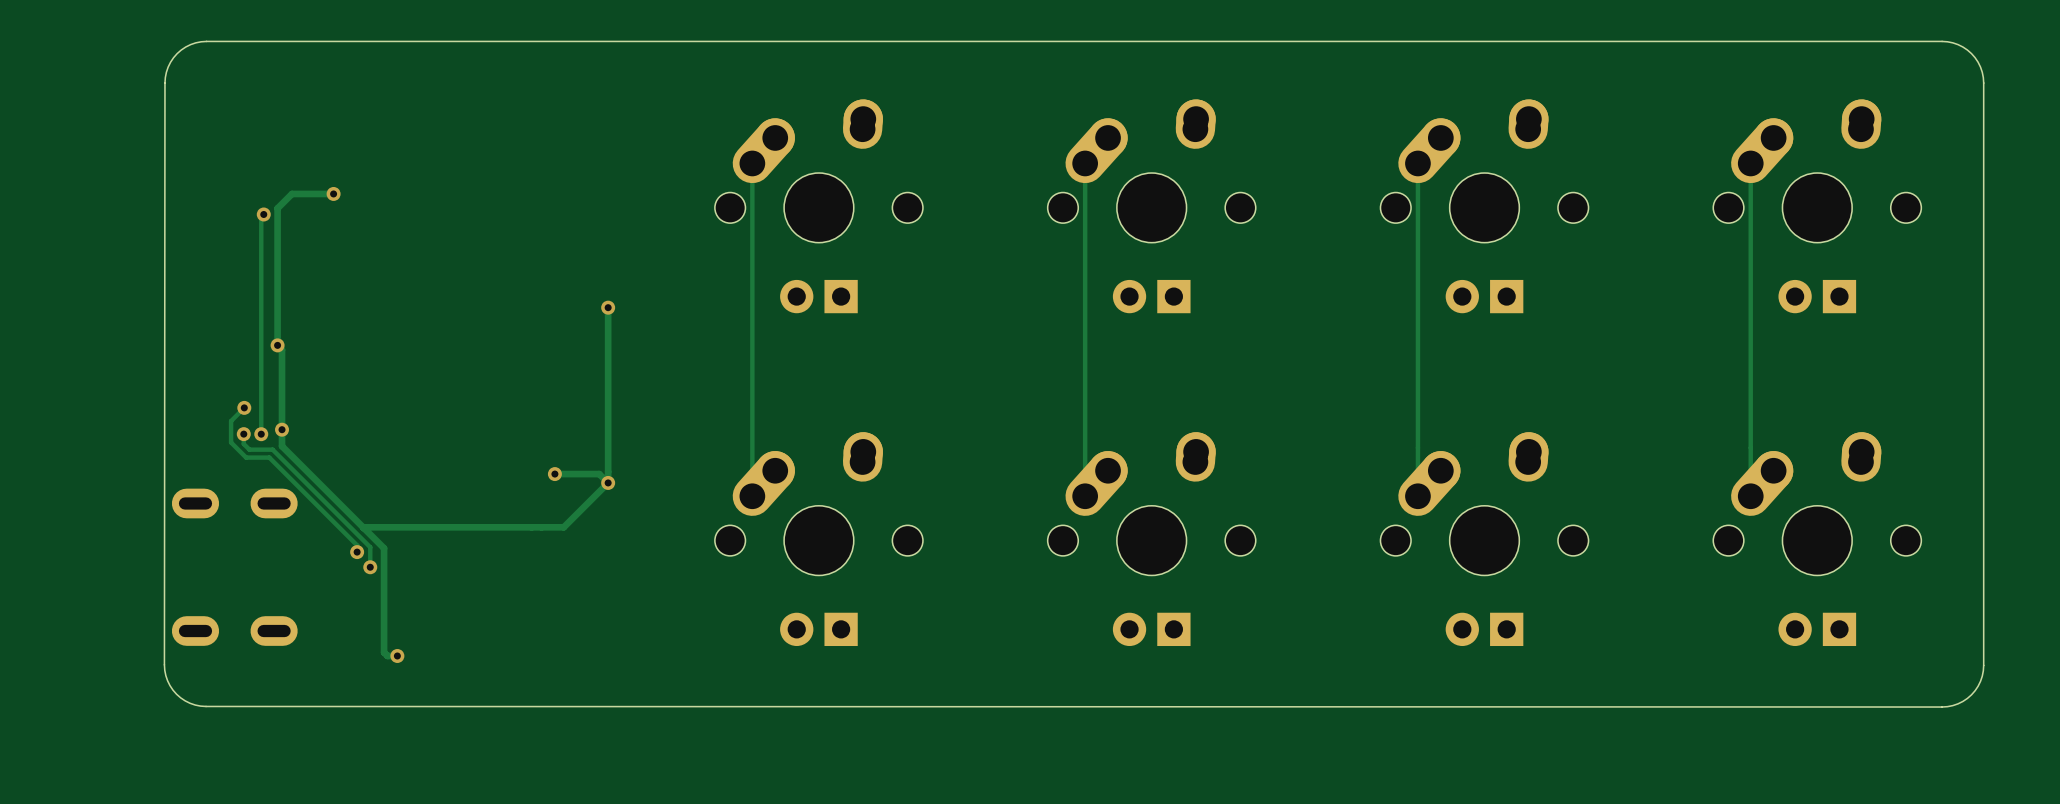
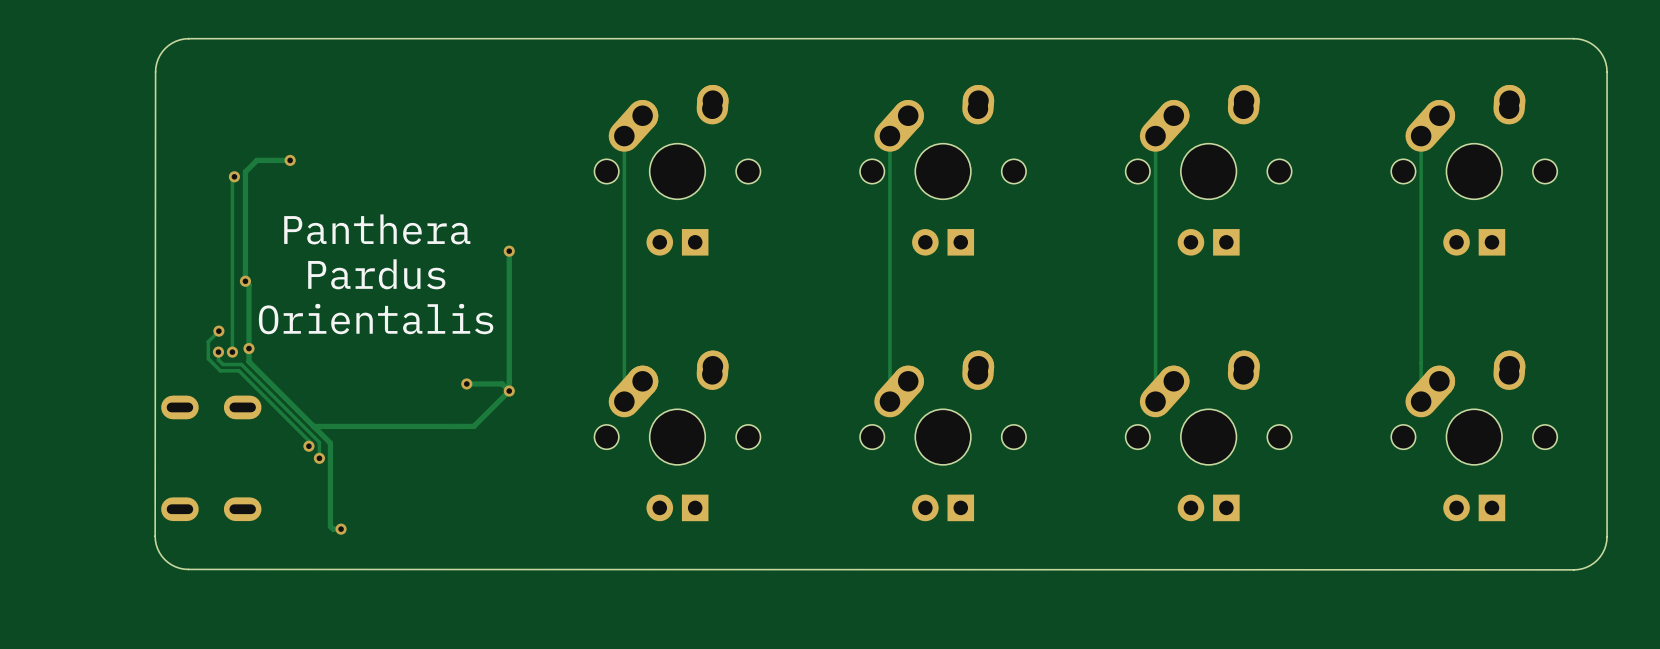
text: none -> Panthera (377, 229)
text: none -> Pardus (376, 274)
text: none -> Orientalis (376, 319)

